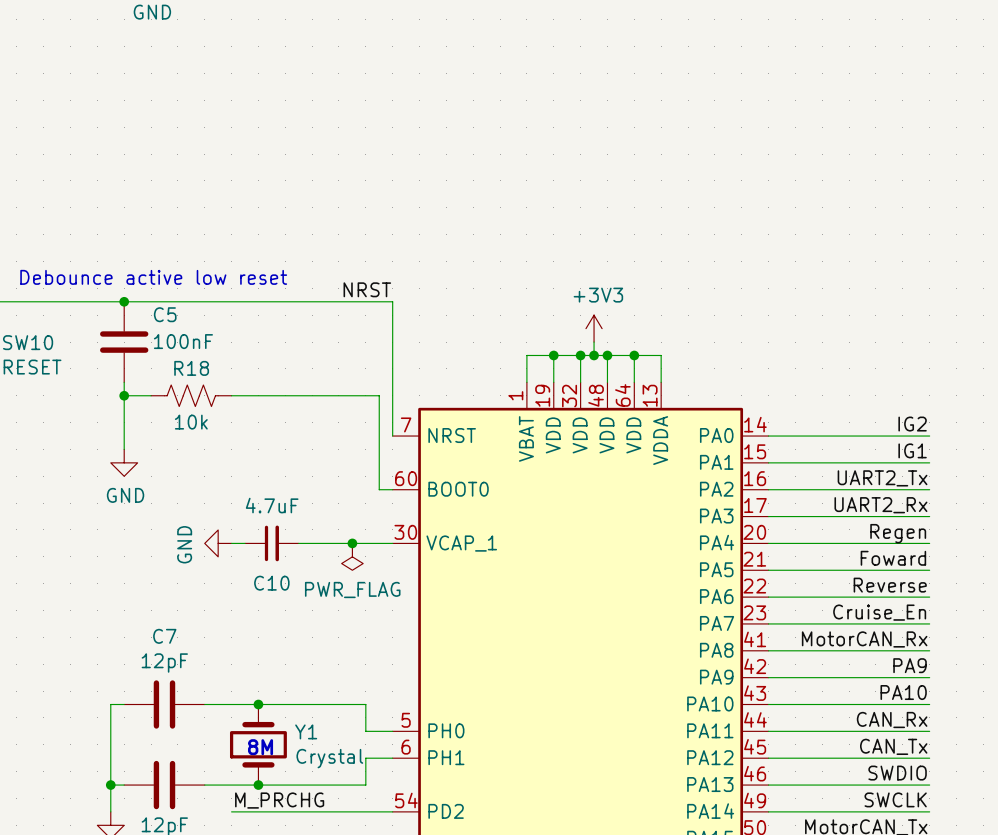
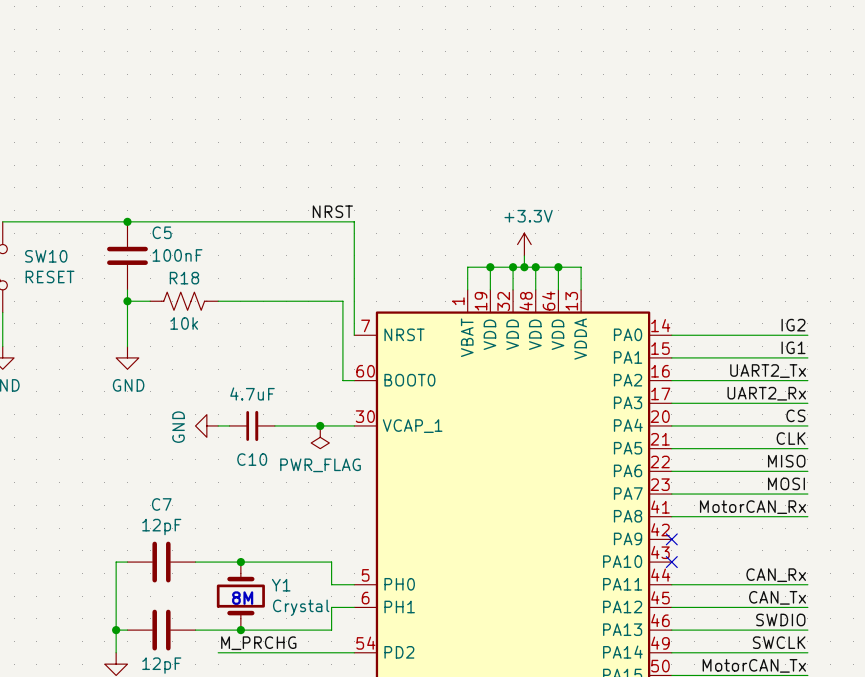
text: Debounce active low reset (153, 277) -> none
power symbol: +3V3 (594, 328) -> +3.3V (524, 244)
label: Regen (898, 533) -> CS (795, 415)
label: Foward (893, 558) -> CLK (791, 438)
label: Reverse (890, 585) -> MISO (786, 461)
label: Cruise_En (879, 612) -> MOSI (786, 483)
label: PA9 (910, 665) -> none
wire: (768, 677) (929, 677) -> none
no-connect mark: none -> (671, 539)
label: PA10 (903, 692) -> none
wire: (768, 704) (929, 704) -> none
no-connect mark: none -> (671, 562)

